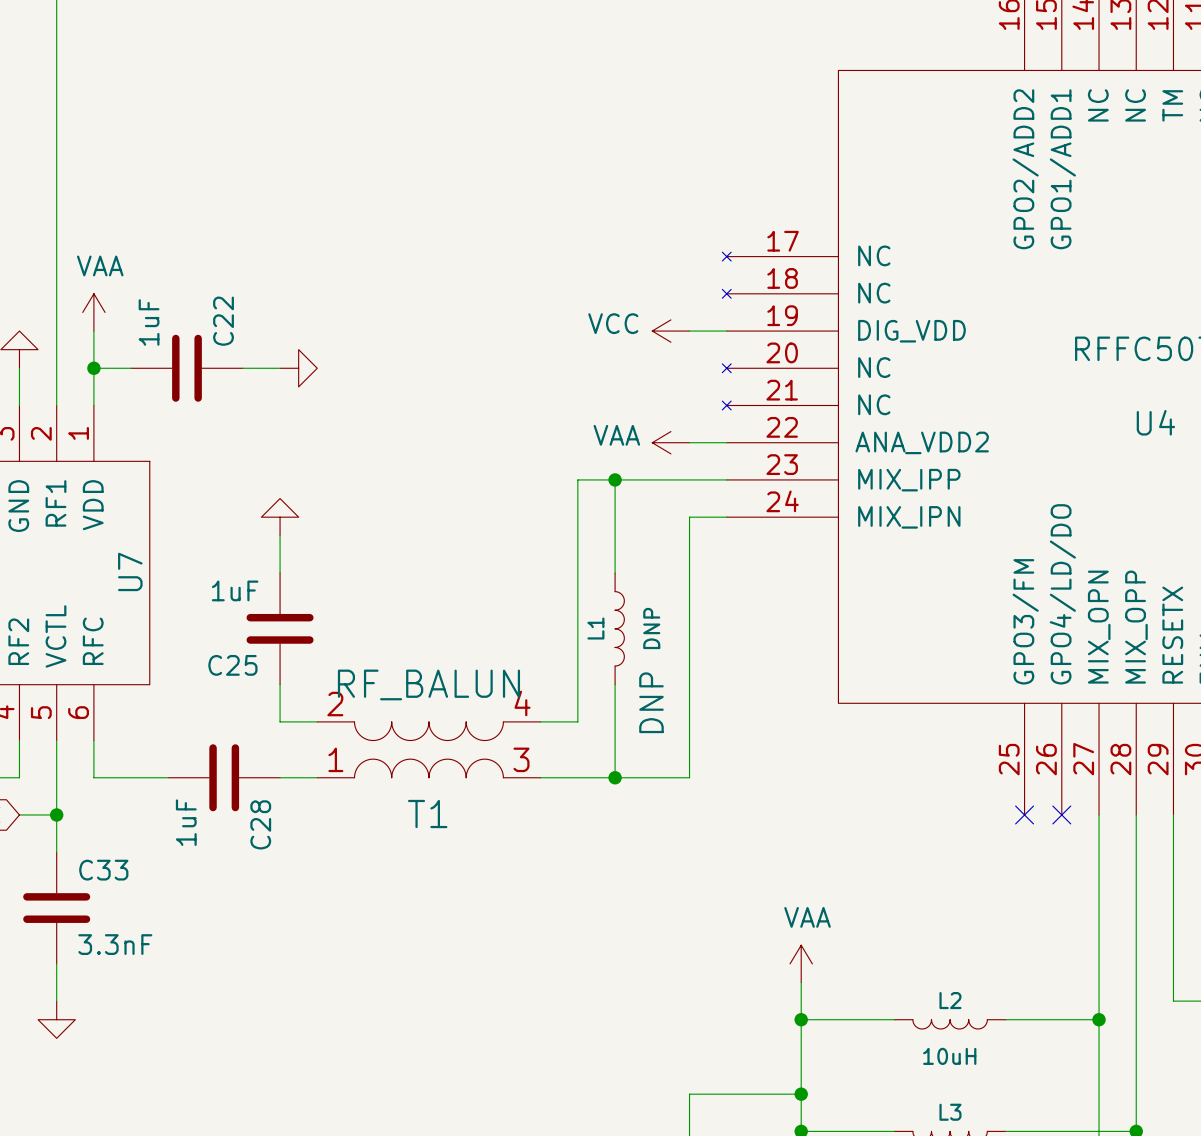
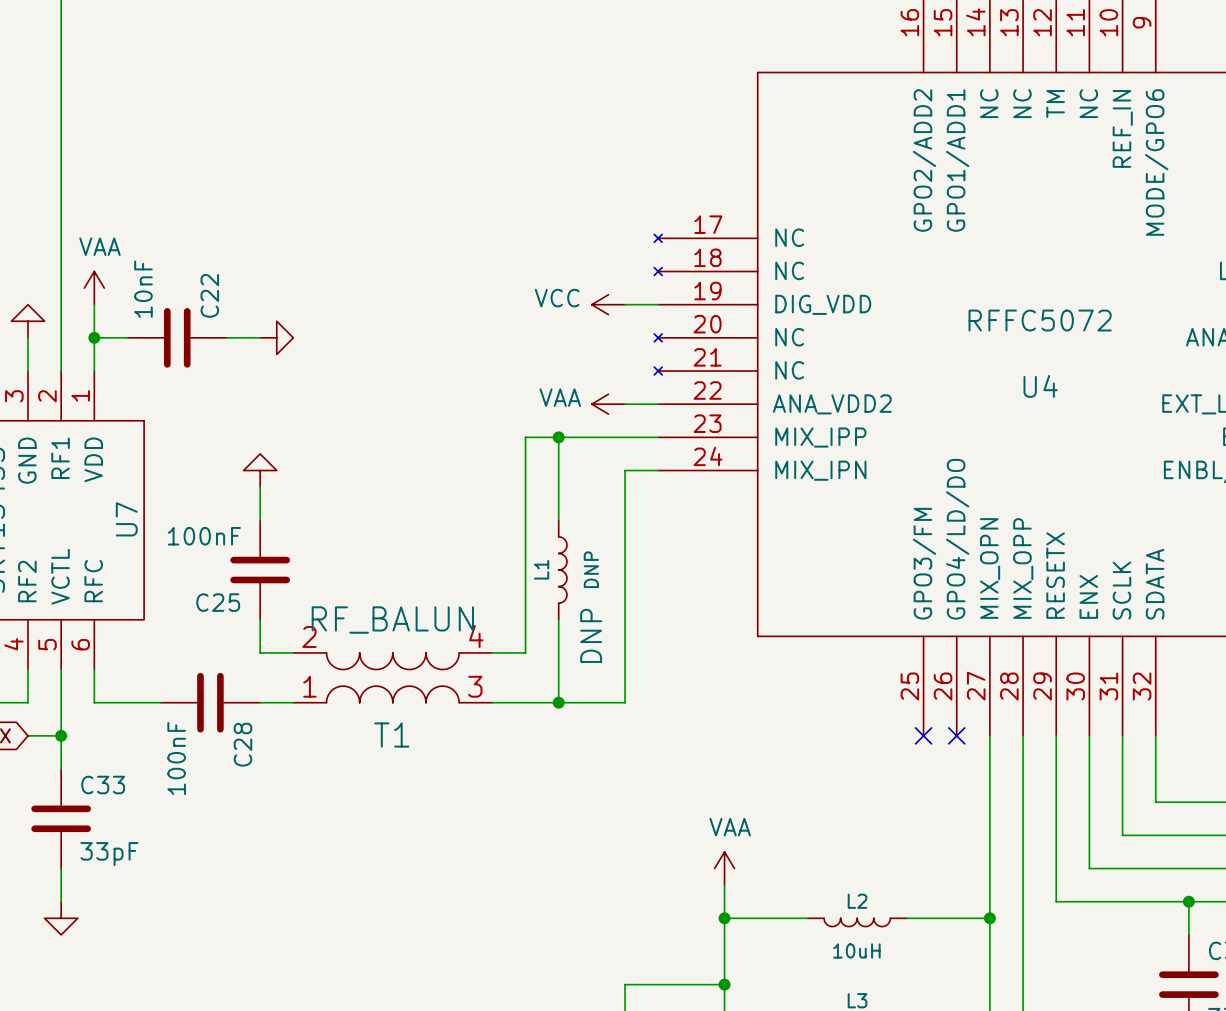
C22 value: 1uF (149, 322) -> 10nF (143, 289)
C25 value: 1uF (235, 590) -> 100nF (204, 536)
C28 value: 1uF (186, 822) -> 100nF (176, 758)
C33 value: 3.3nF (115, 944) -> 33pF (109, 854)

